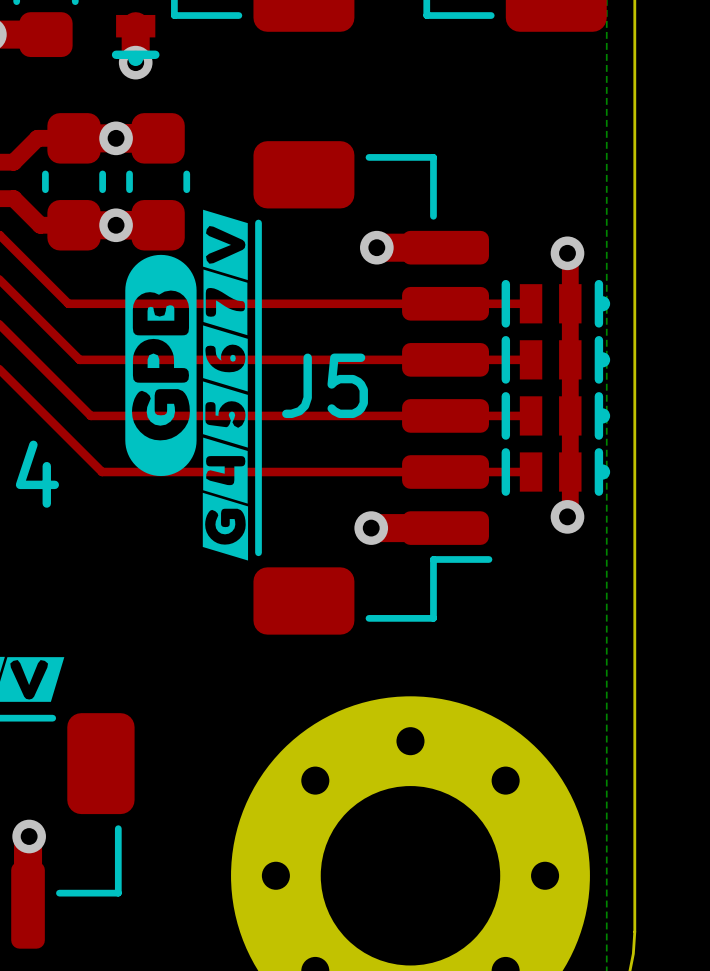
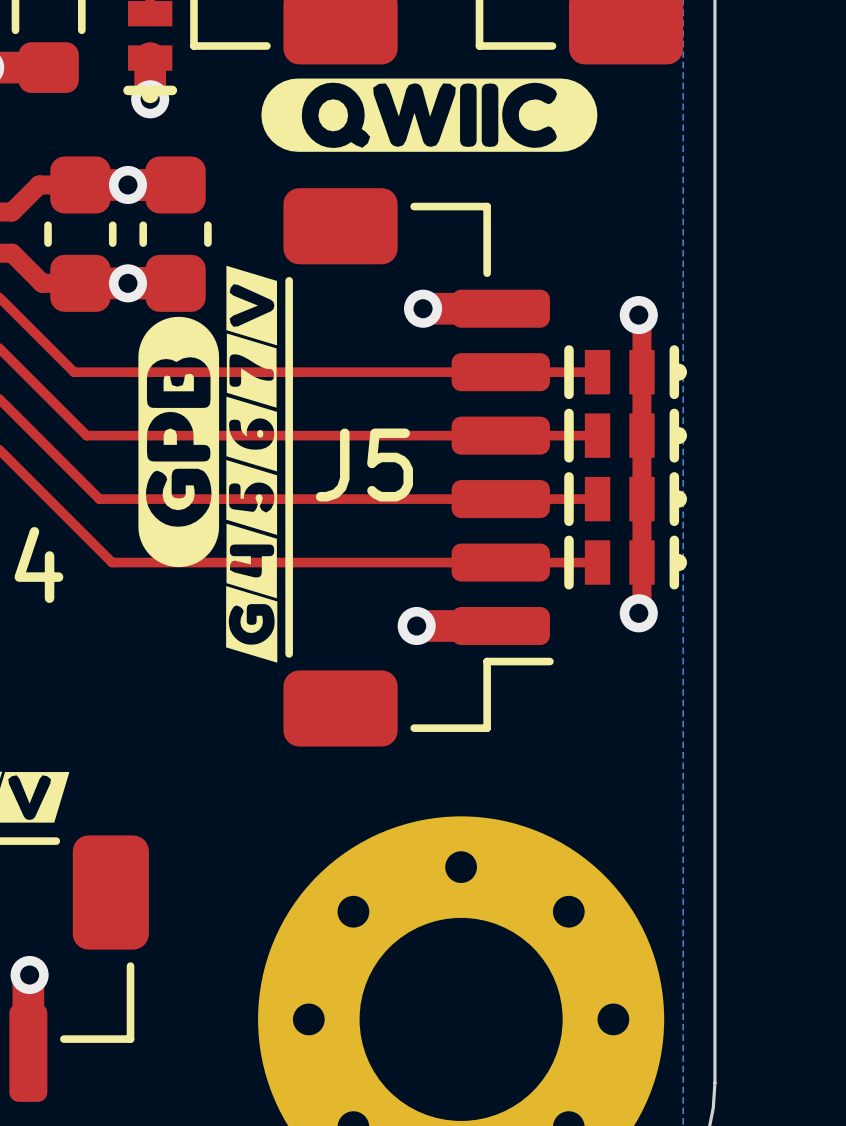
drawing: none -> [261, 78, 598, 152]

